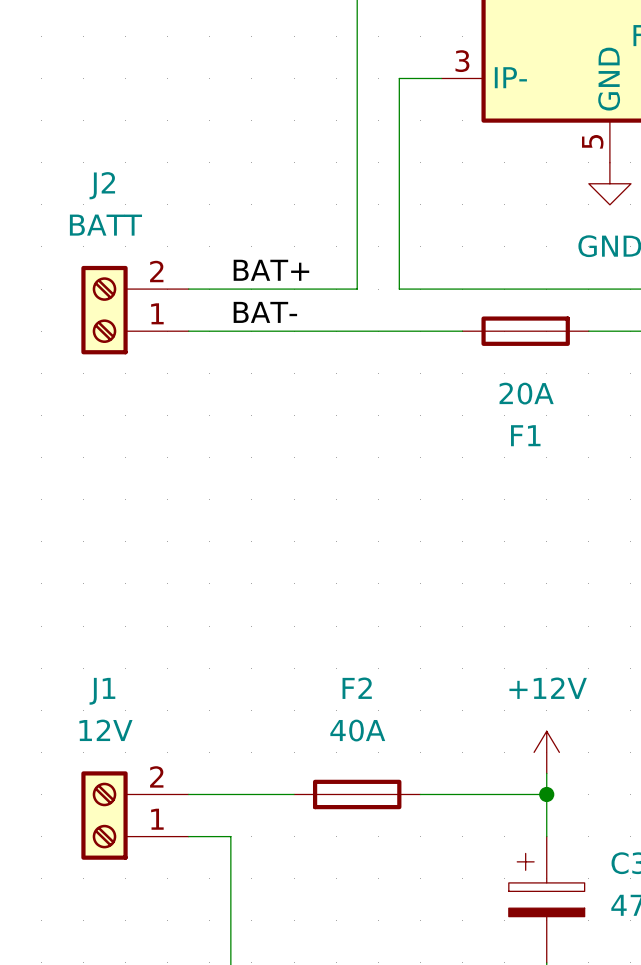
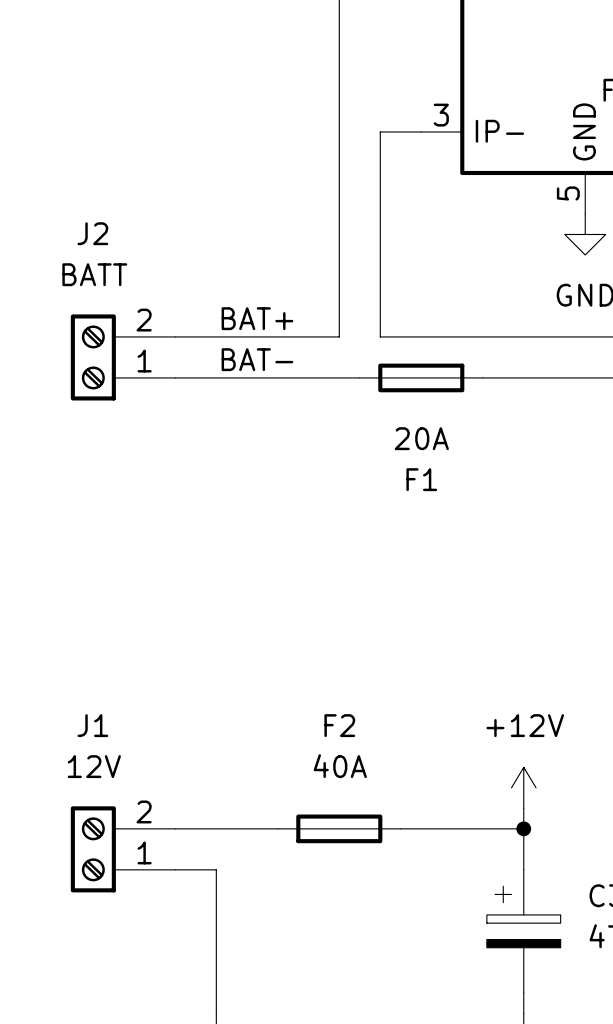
F1 position: (525, 331) -> (421, 377)

